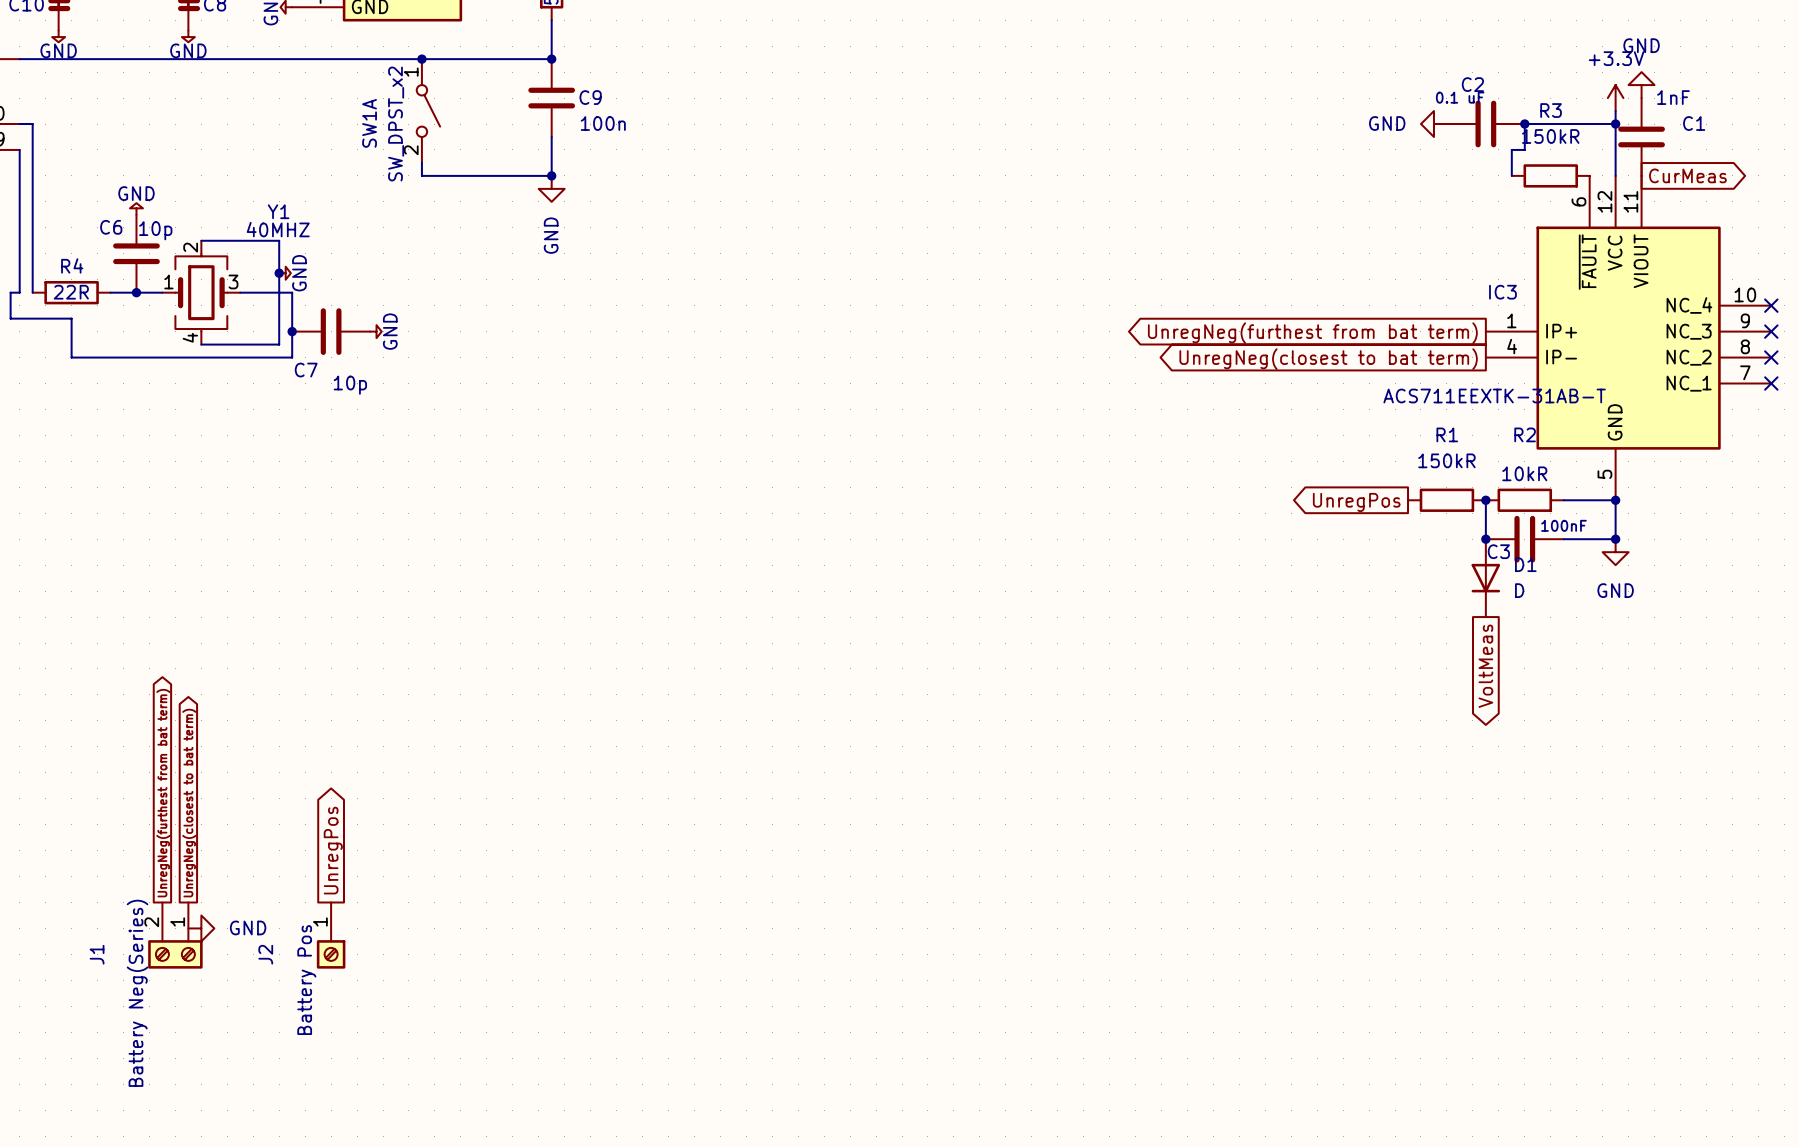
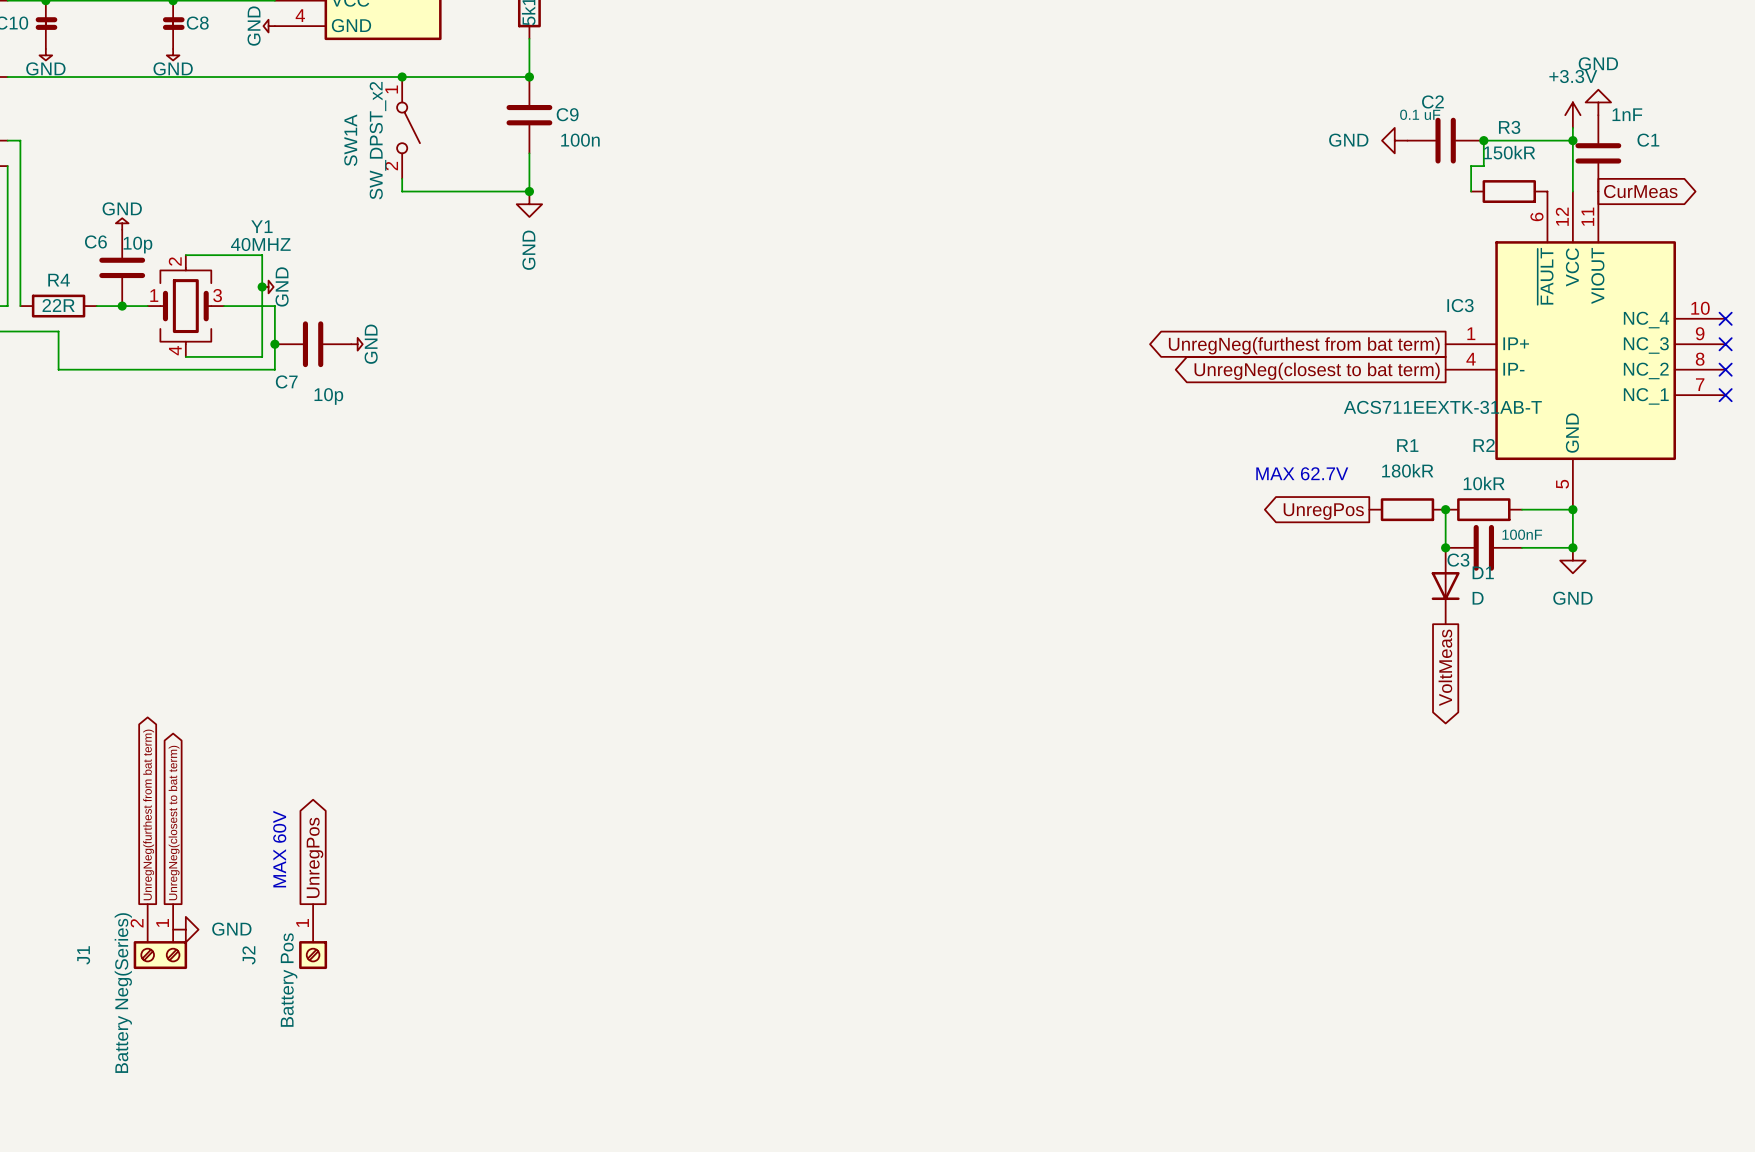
R1 value: 150kR (1446, 460) -> 180kR (1407, 470)
text: none -> MAX 62.7V (1302, 473)
text: none -> MAX 60V (279, 849)

